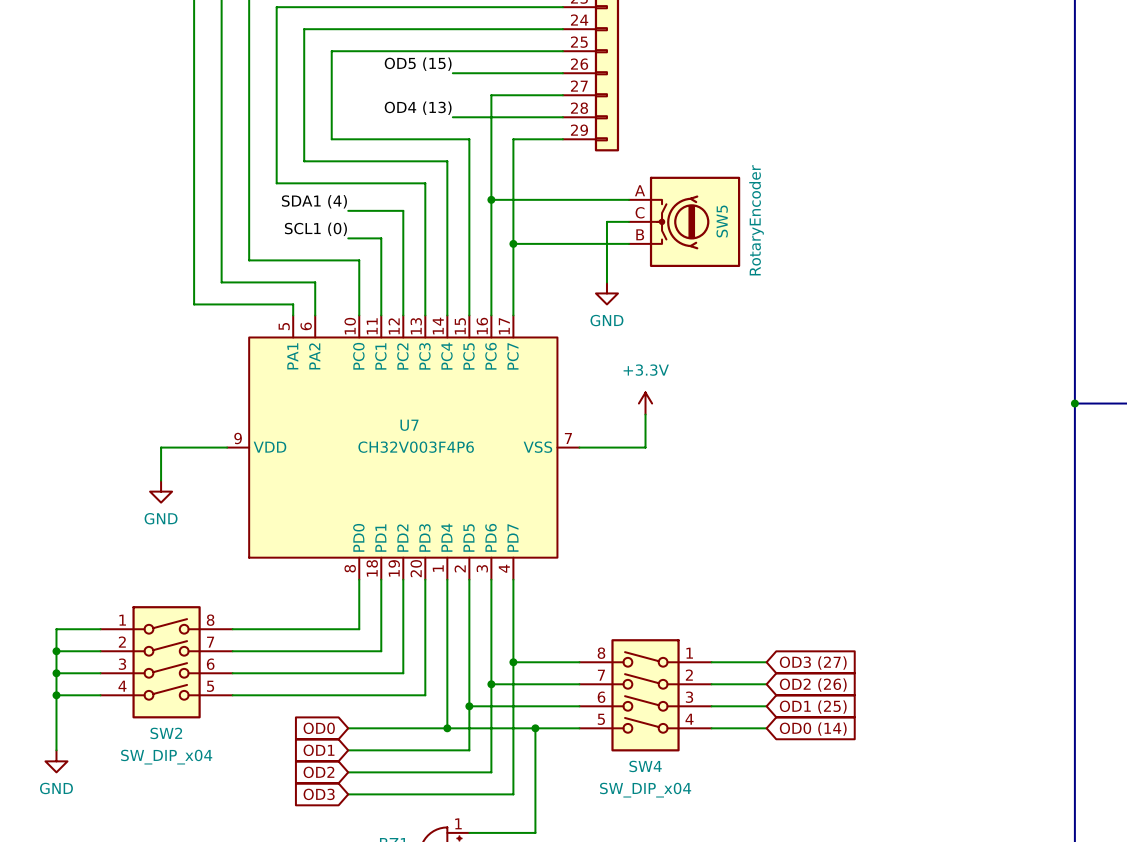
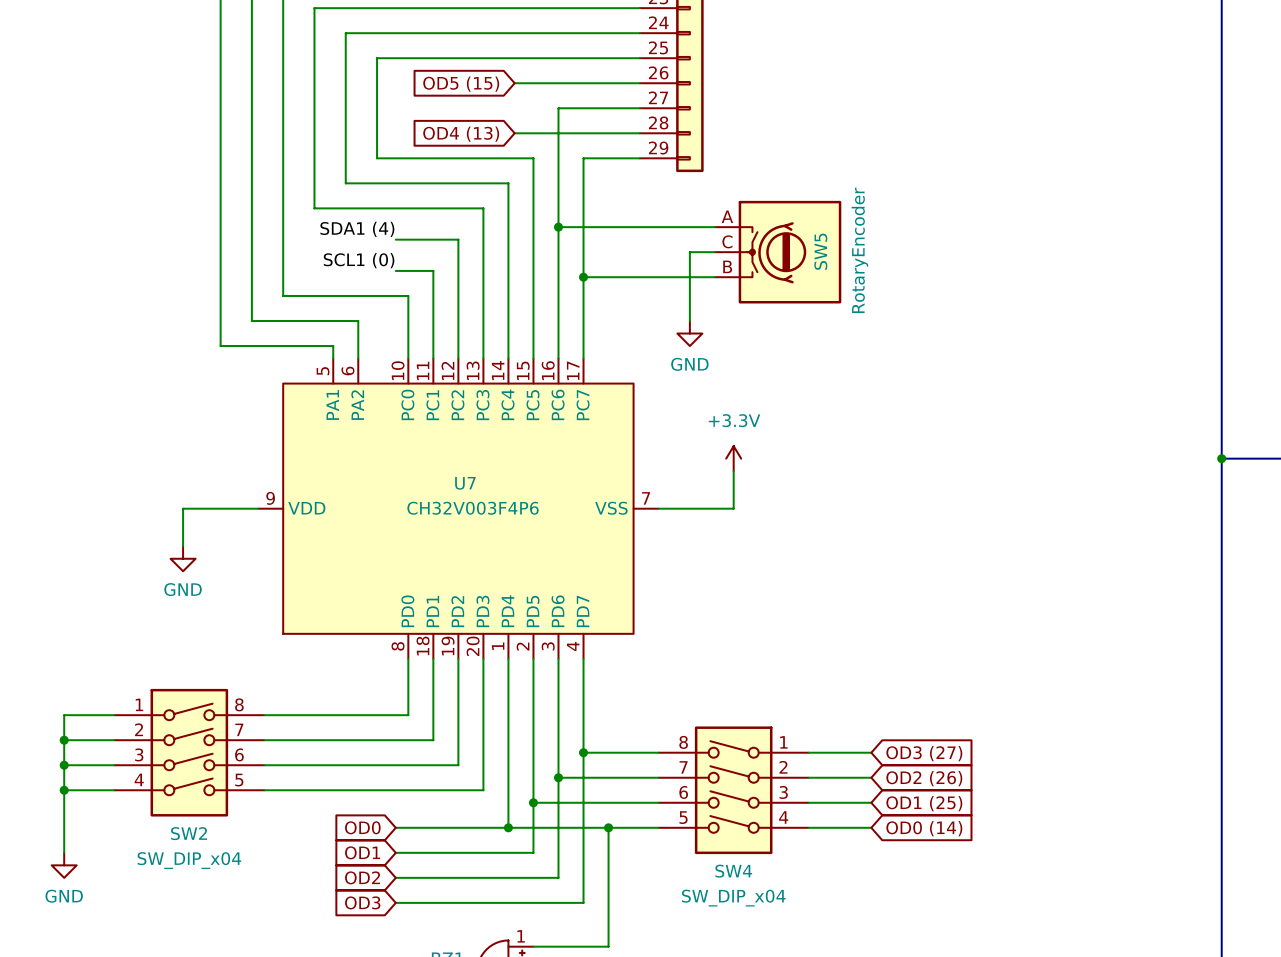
label: OD5 (15) (418, 64) -> none
global label: none -> OD5 (15) (461, 84)
label: OD4 (13) (418, 108) -> none
global label: none -> OD4 (13) (461, 134)

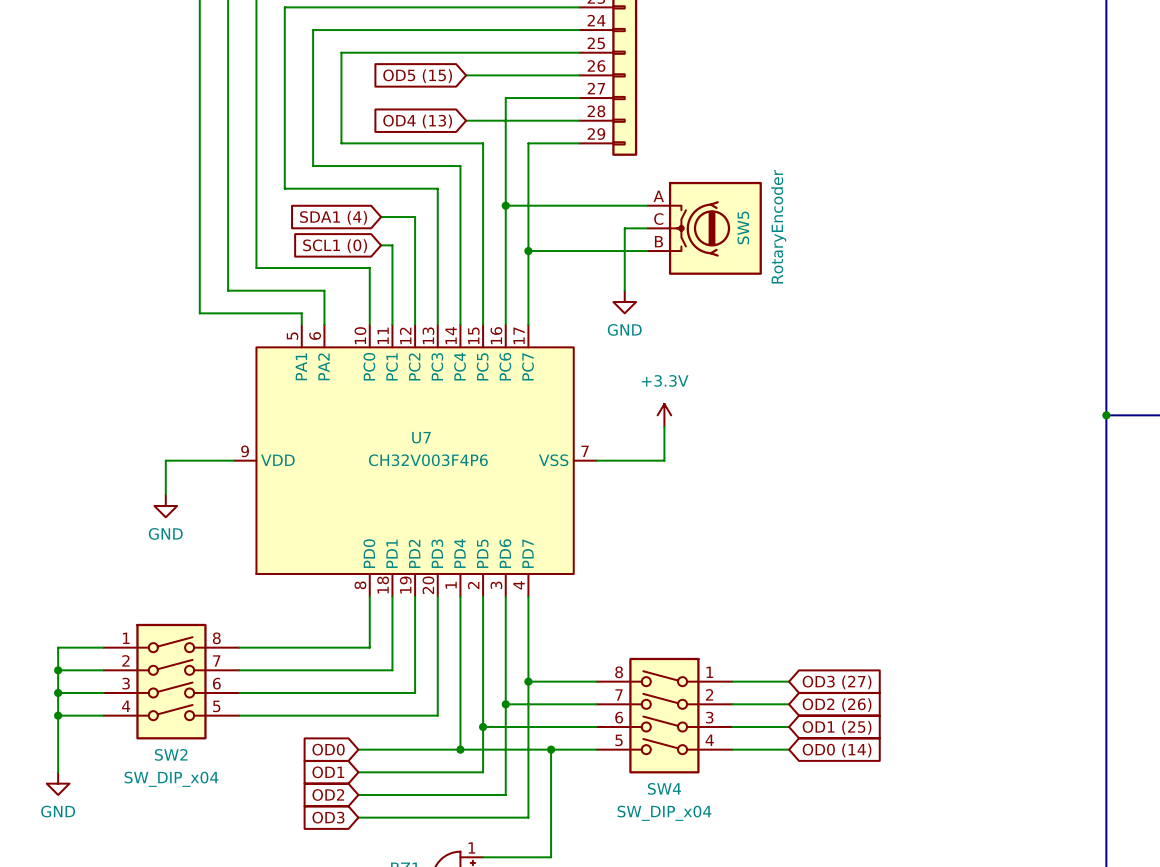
label: SDA1 (4) (357, 229) -> none
wire: (395, 239) (420, 239) -> none
global label: none -> SDA1 (4) (333, 217)
label: SCL1 (0) (359, 260) -> none
wire: (395, 270) (420, 270) -> none
global label: none -> SCL1 (0) (335, 246)

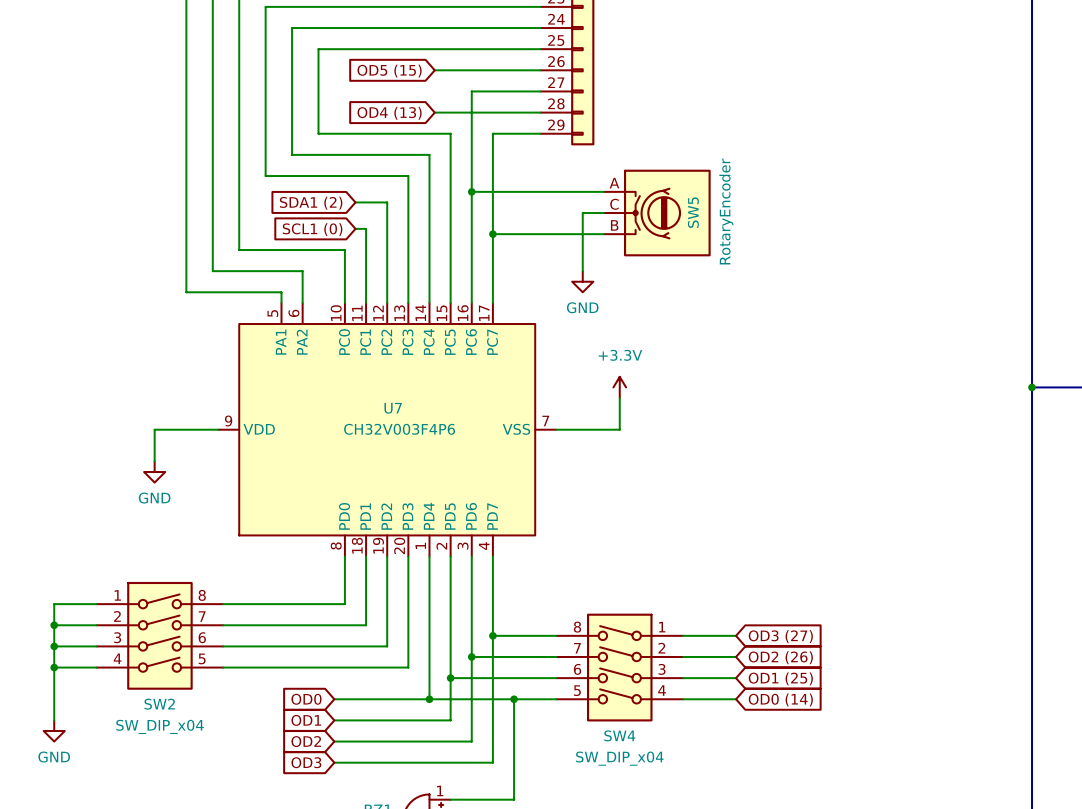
global label: SDA1 (4) (333, 217) -> SDA1 (2) (311, 203)

